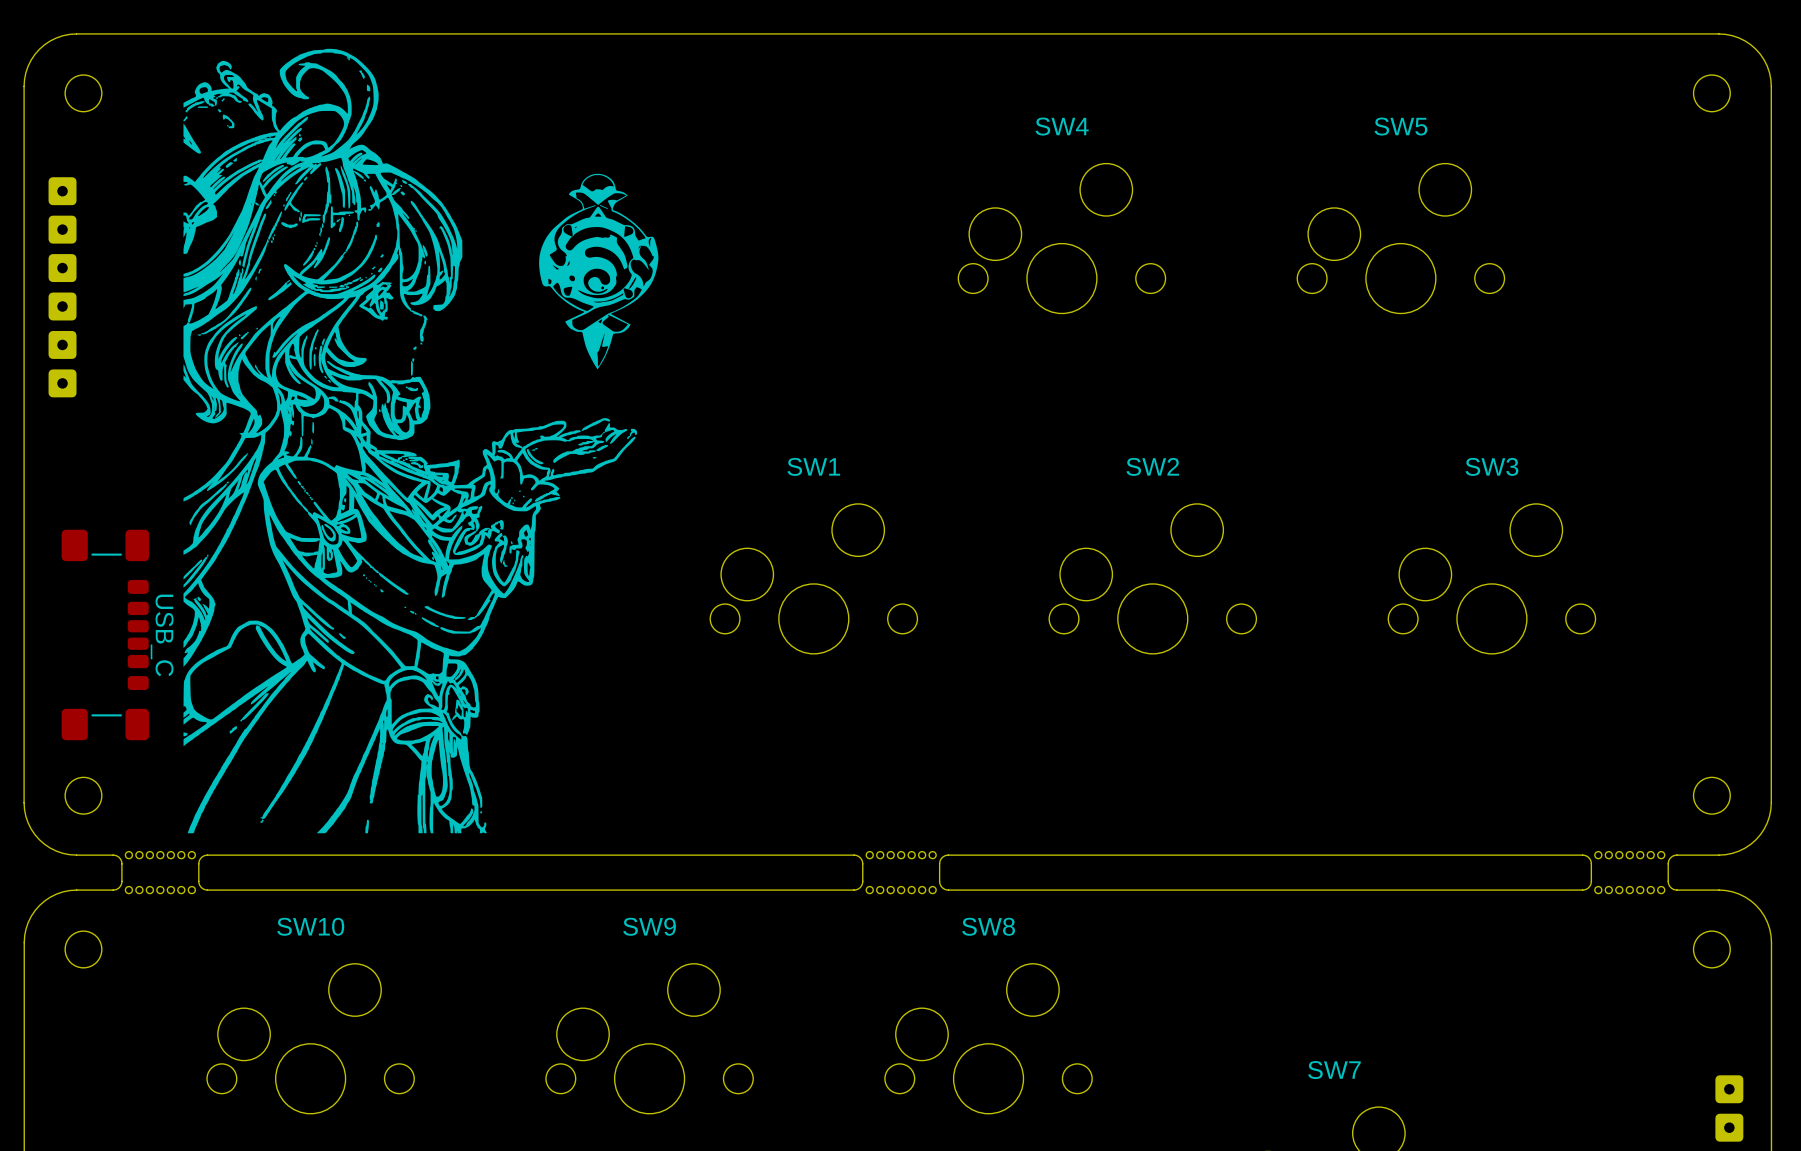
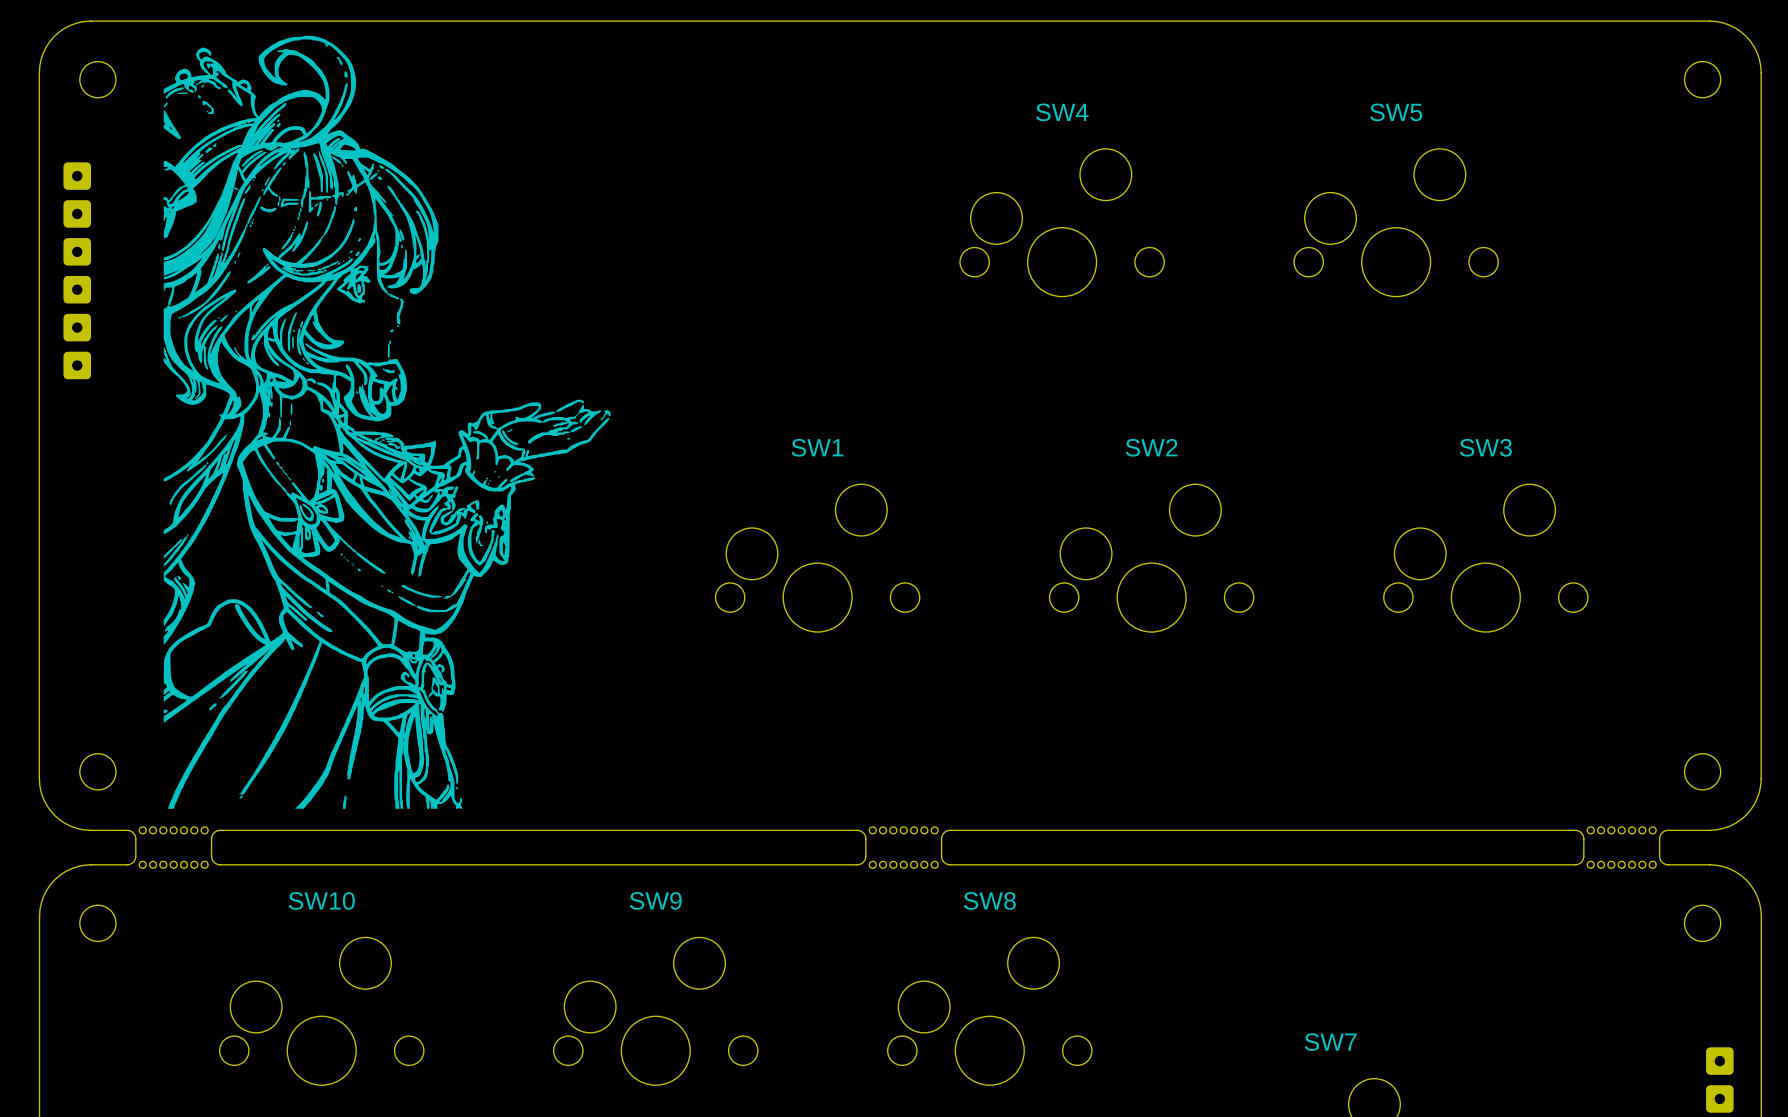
drawing: [539, 173, 659, 370] -> none
drawing position: (410, 441) -> (387, 422)
USB_C: (105, 634) -> none

